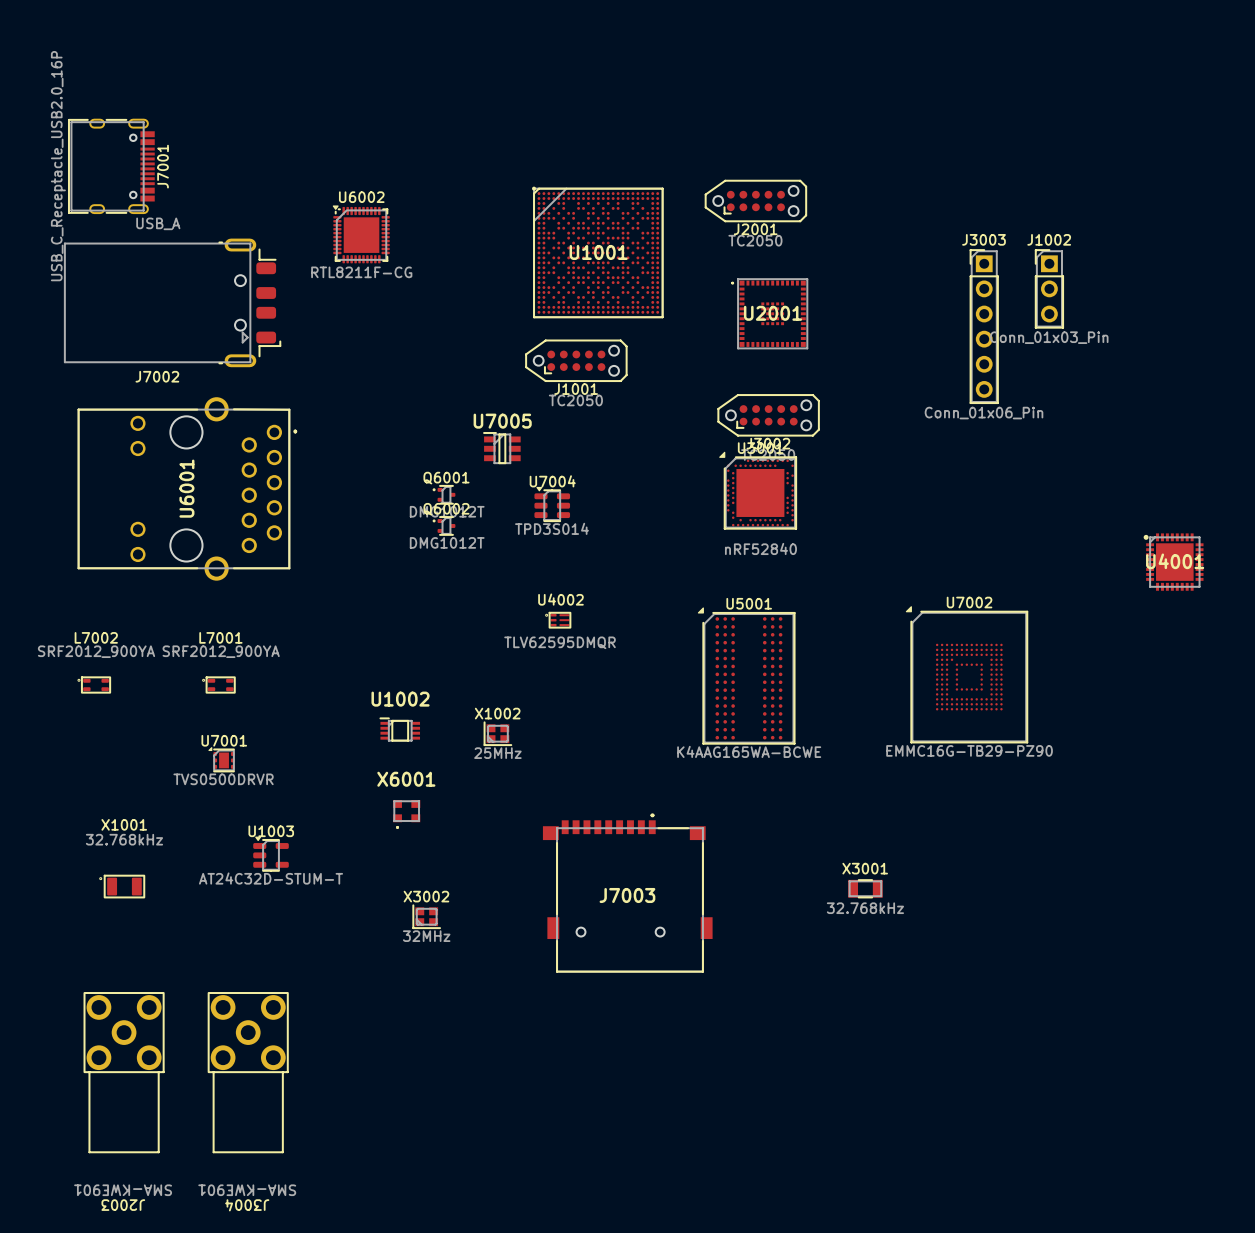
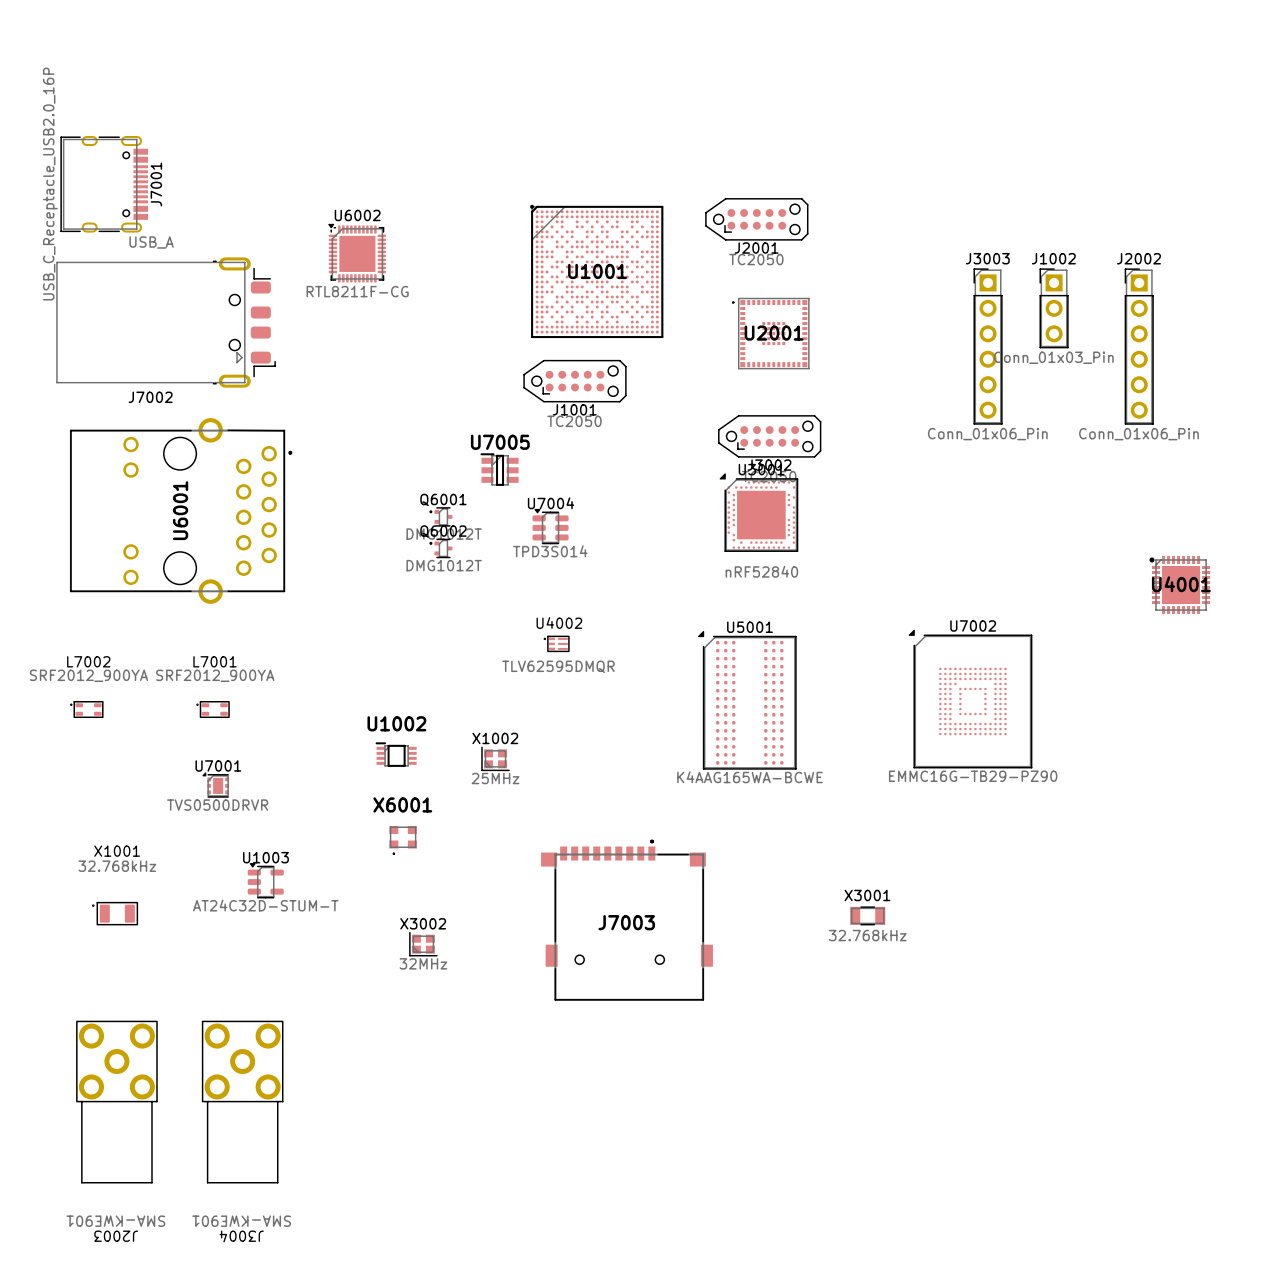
J2002: none -> Conn_01x06_Pin (1139, 346)

